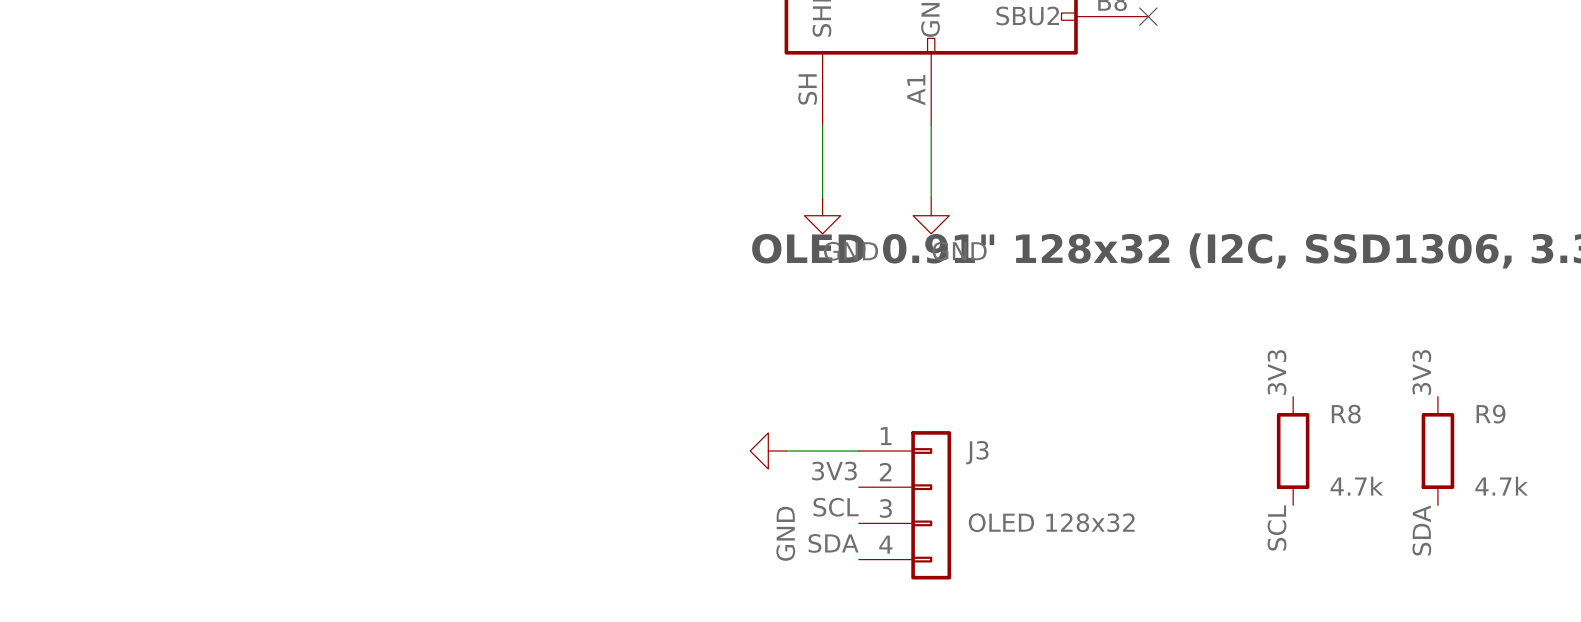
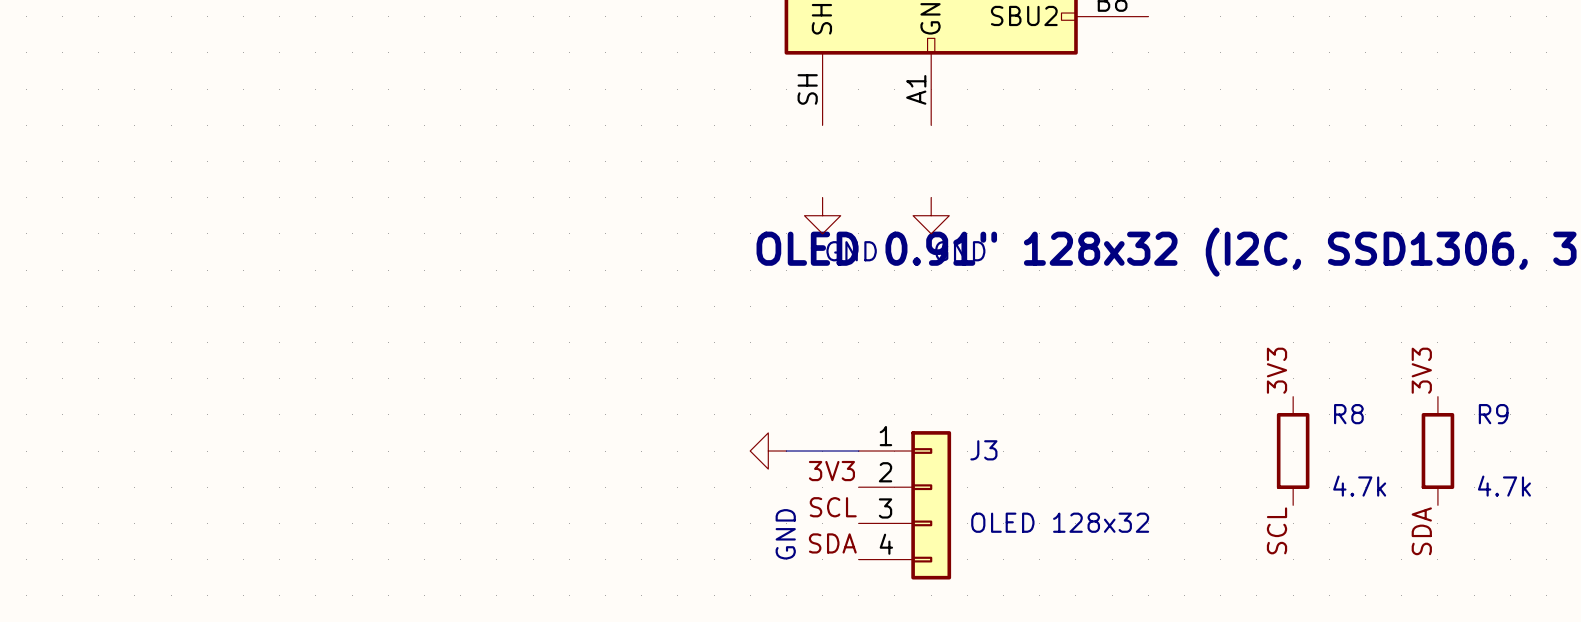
no-connect mark: (1148, 16) -> none
wire: (822, 125) (822, 197) -> none
wire: (931, 125) (931, 197) -> none

